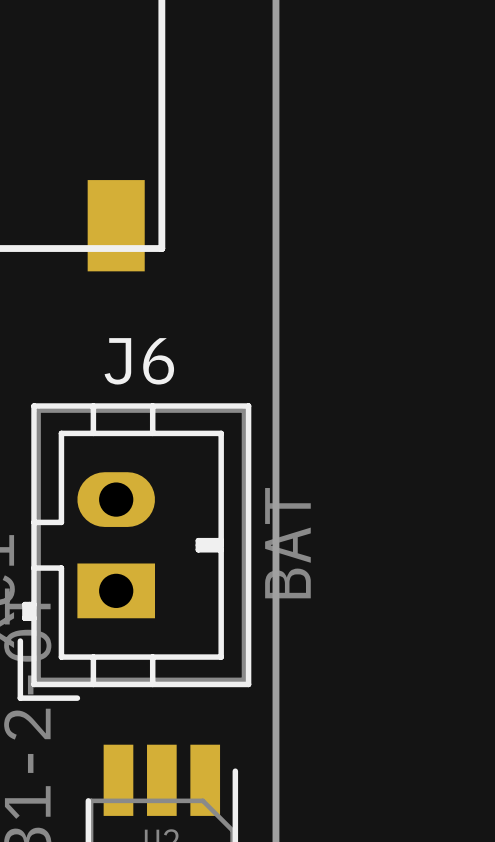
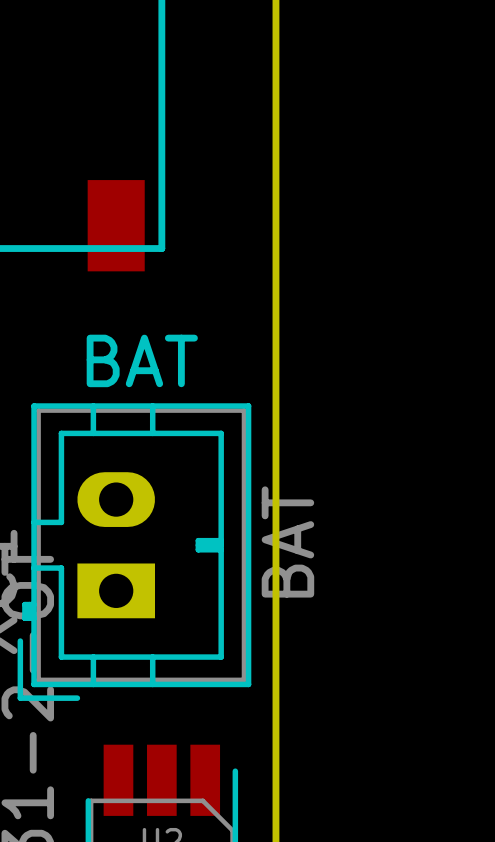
J6 name: J6 (139, 361) -> BAT (142, 360)

